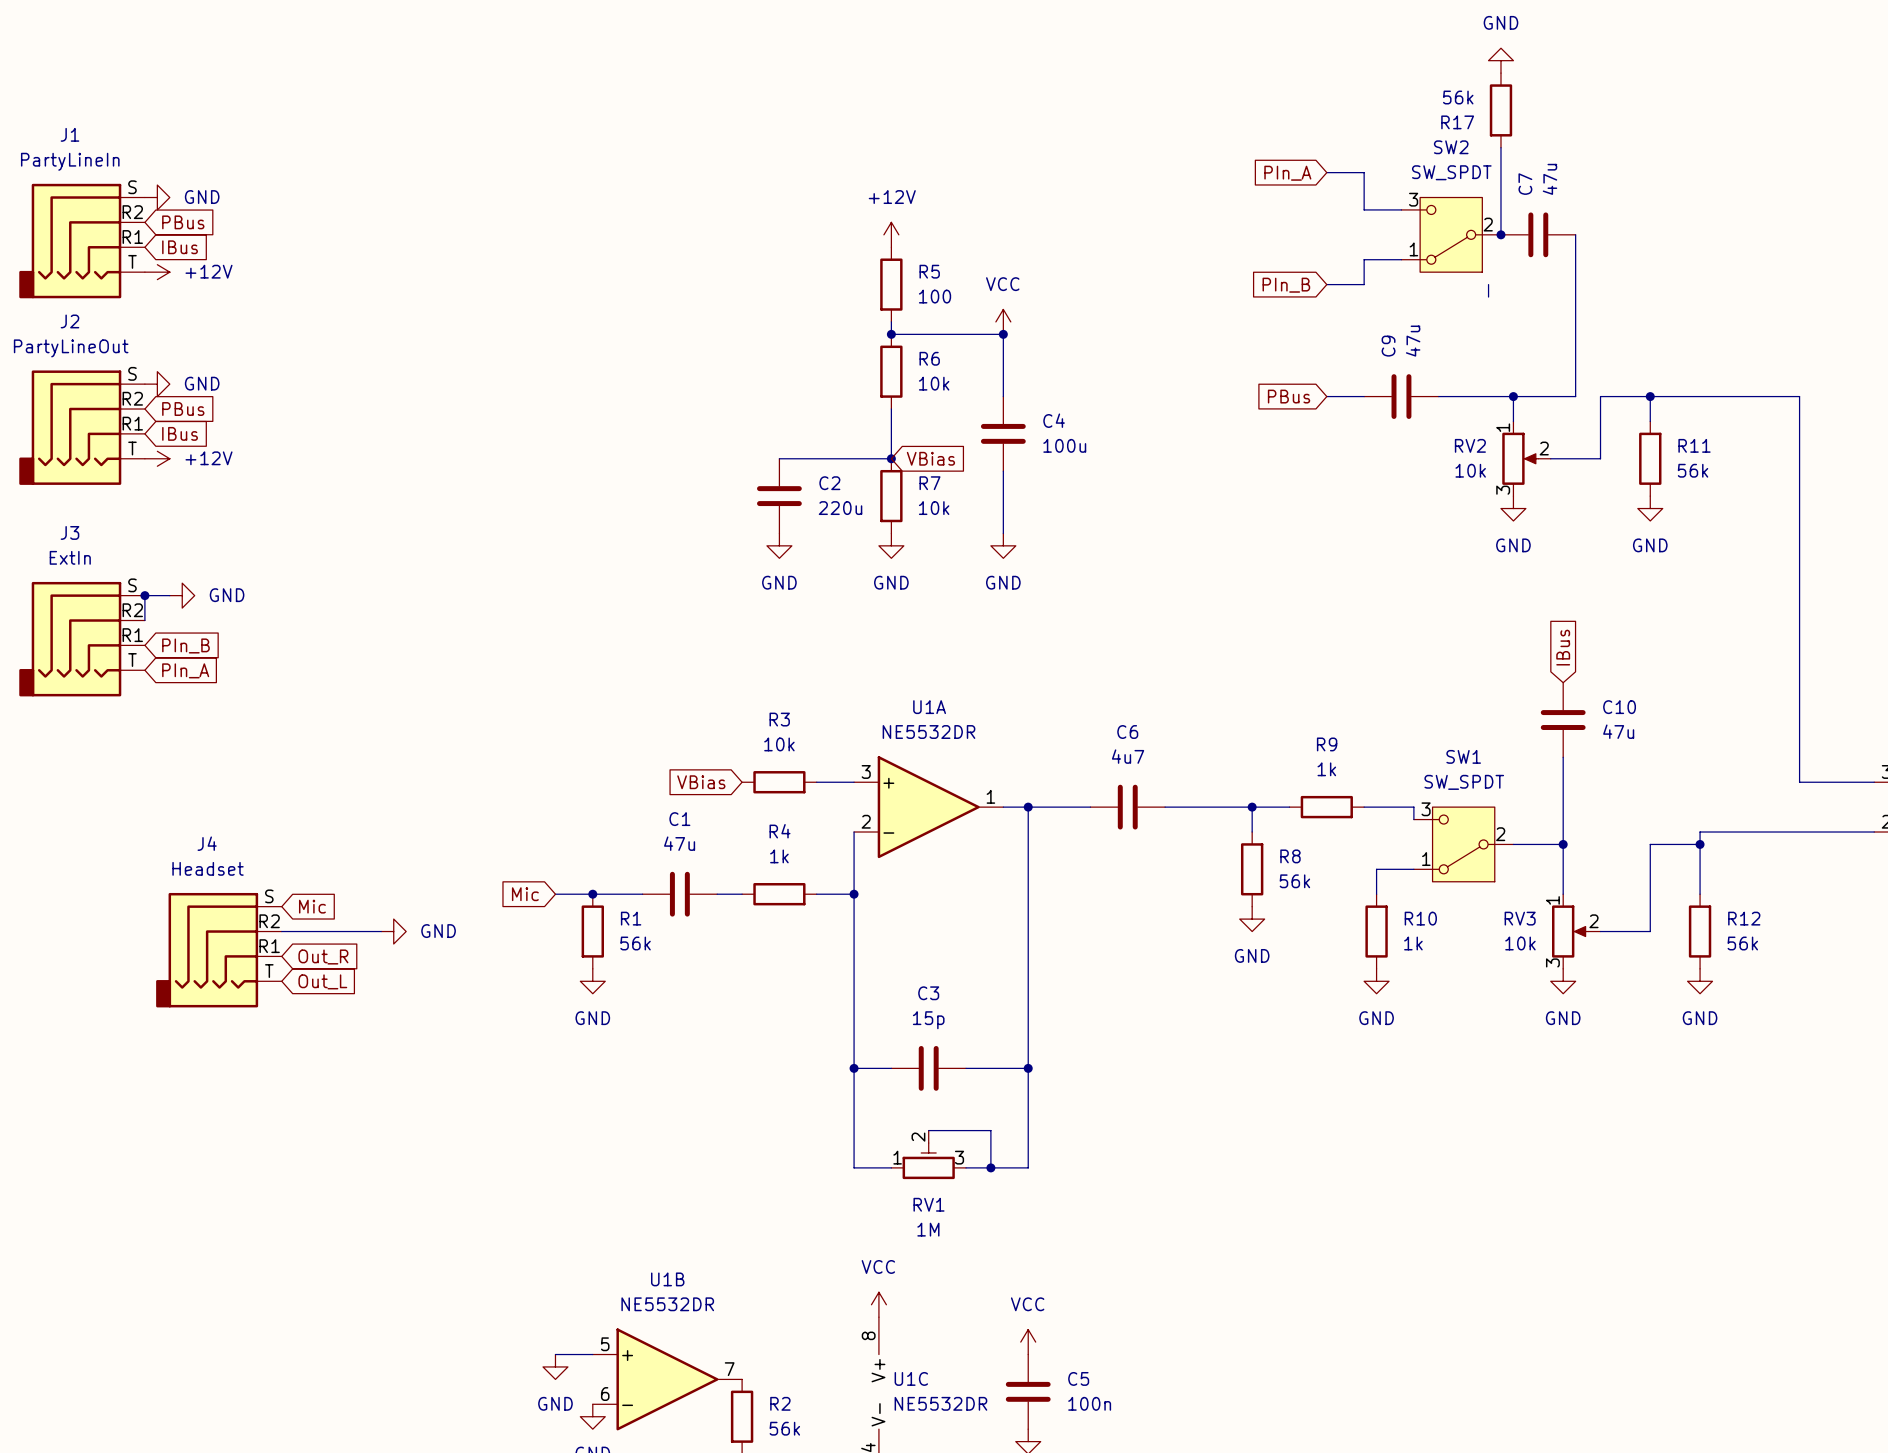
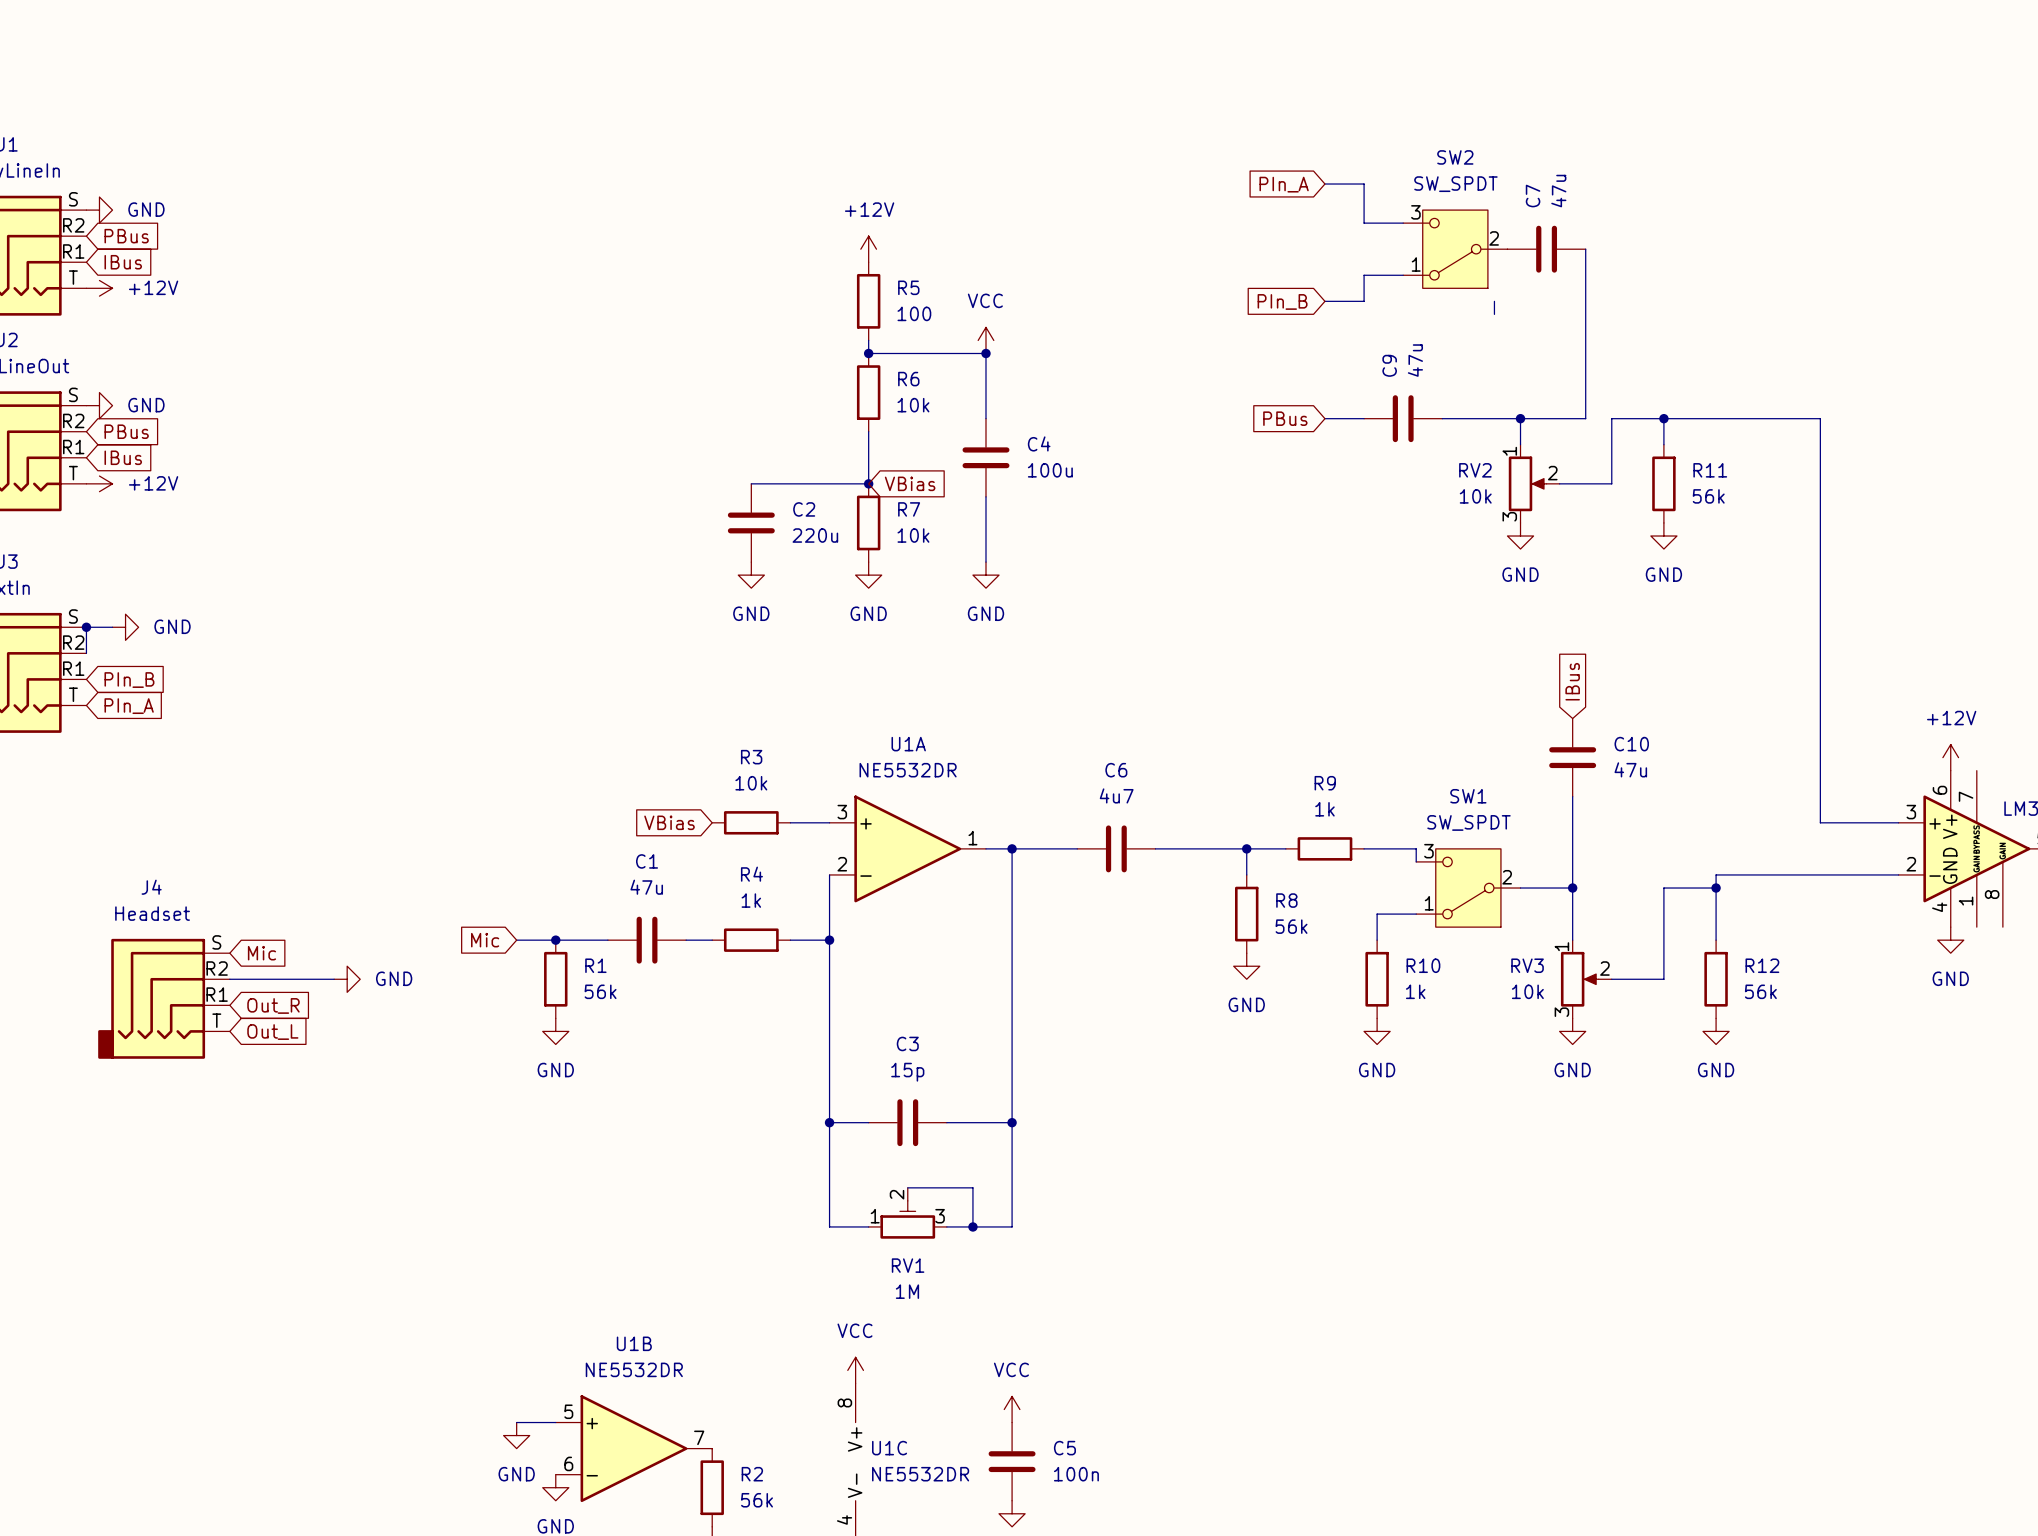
power symbol: GND (1500, 60) -> none
R17: 56k (1500, 110) -> none
wire: (1500, 147) (1500, 234) -> none
junction: (1500, 234) -> none

